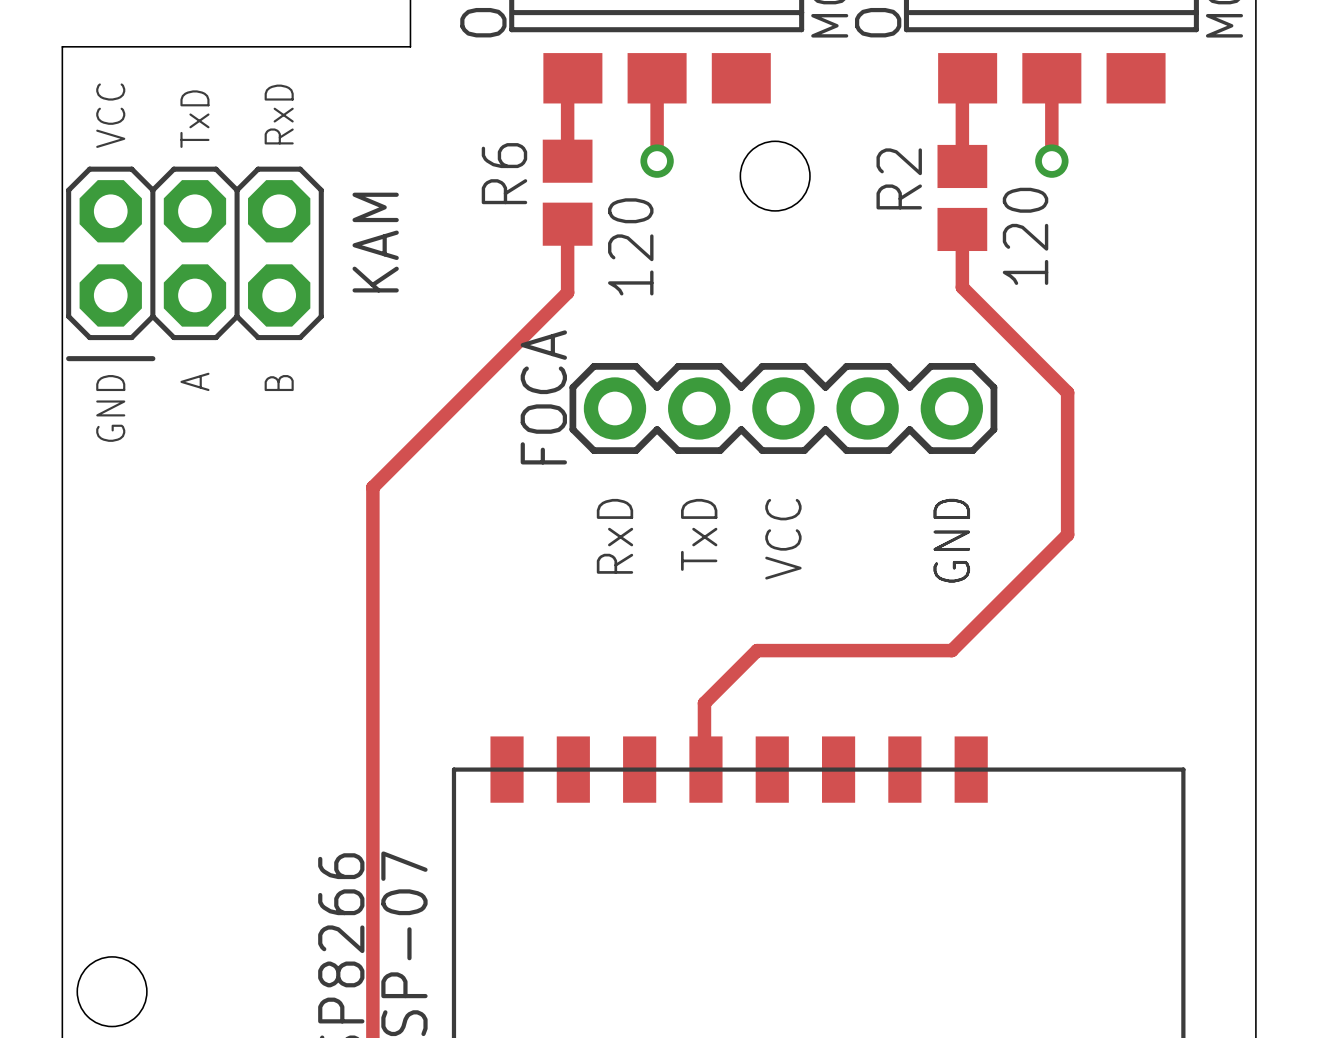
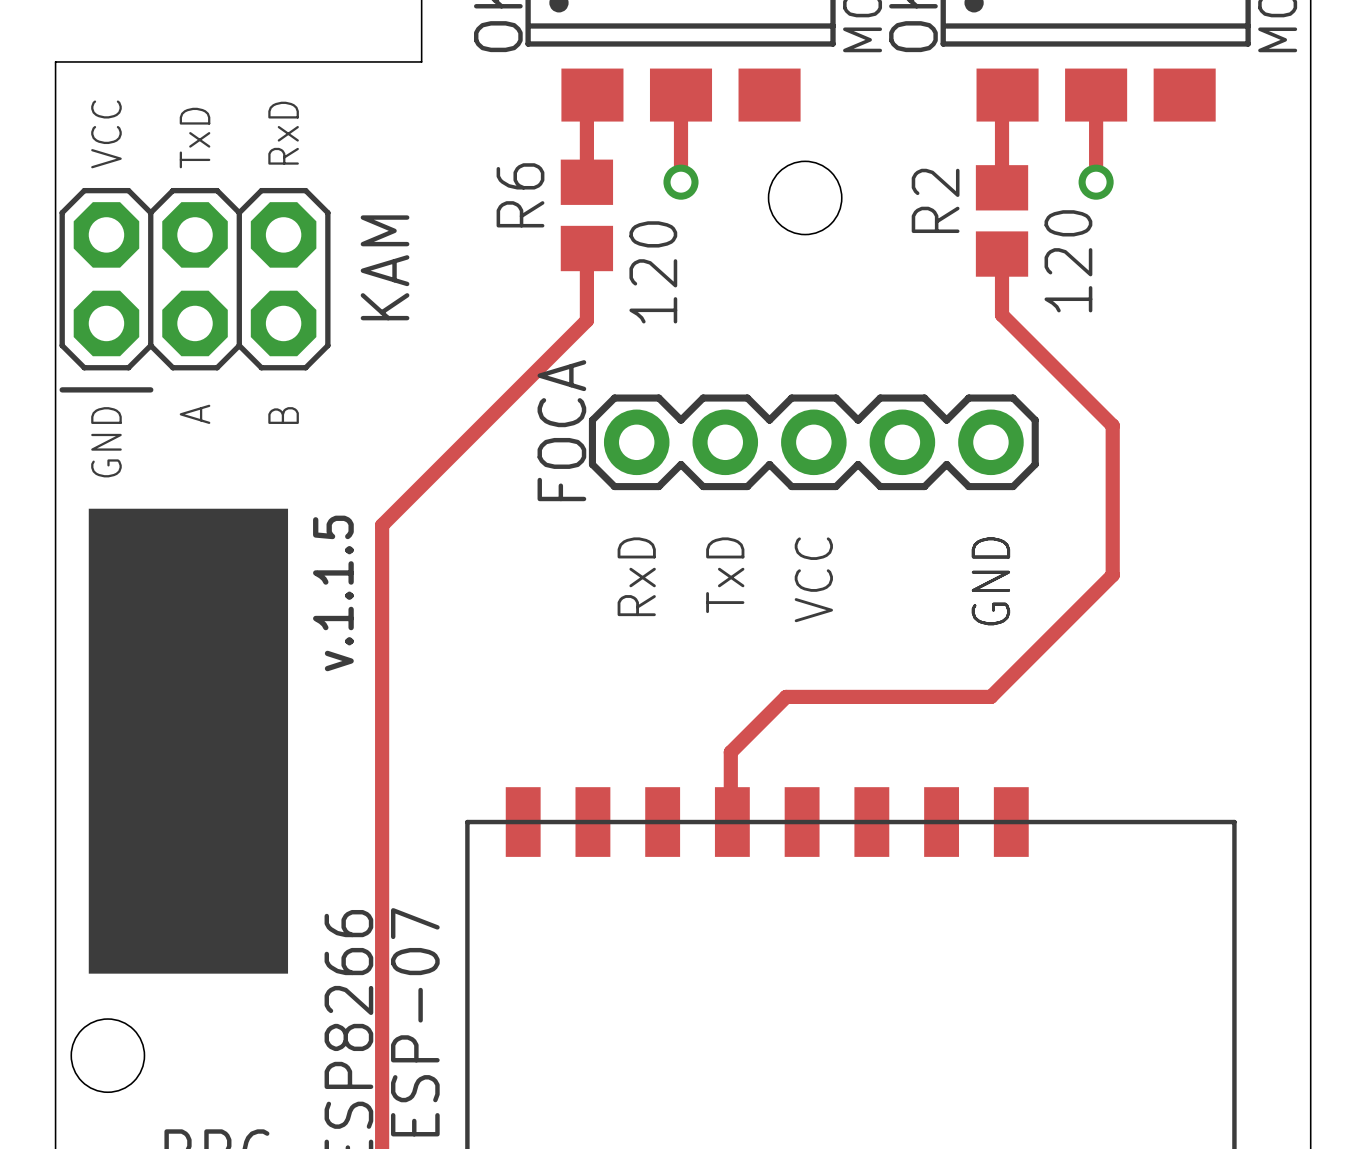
drawing: none -> [88, 508, 289, 974]
text: none -> v.1.1.5 (333, 593)

